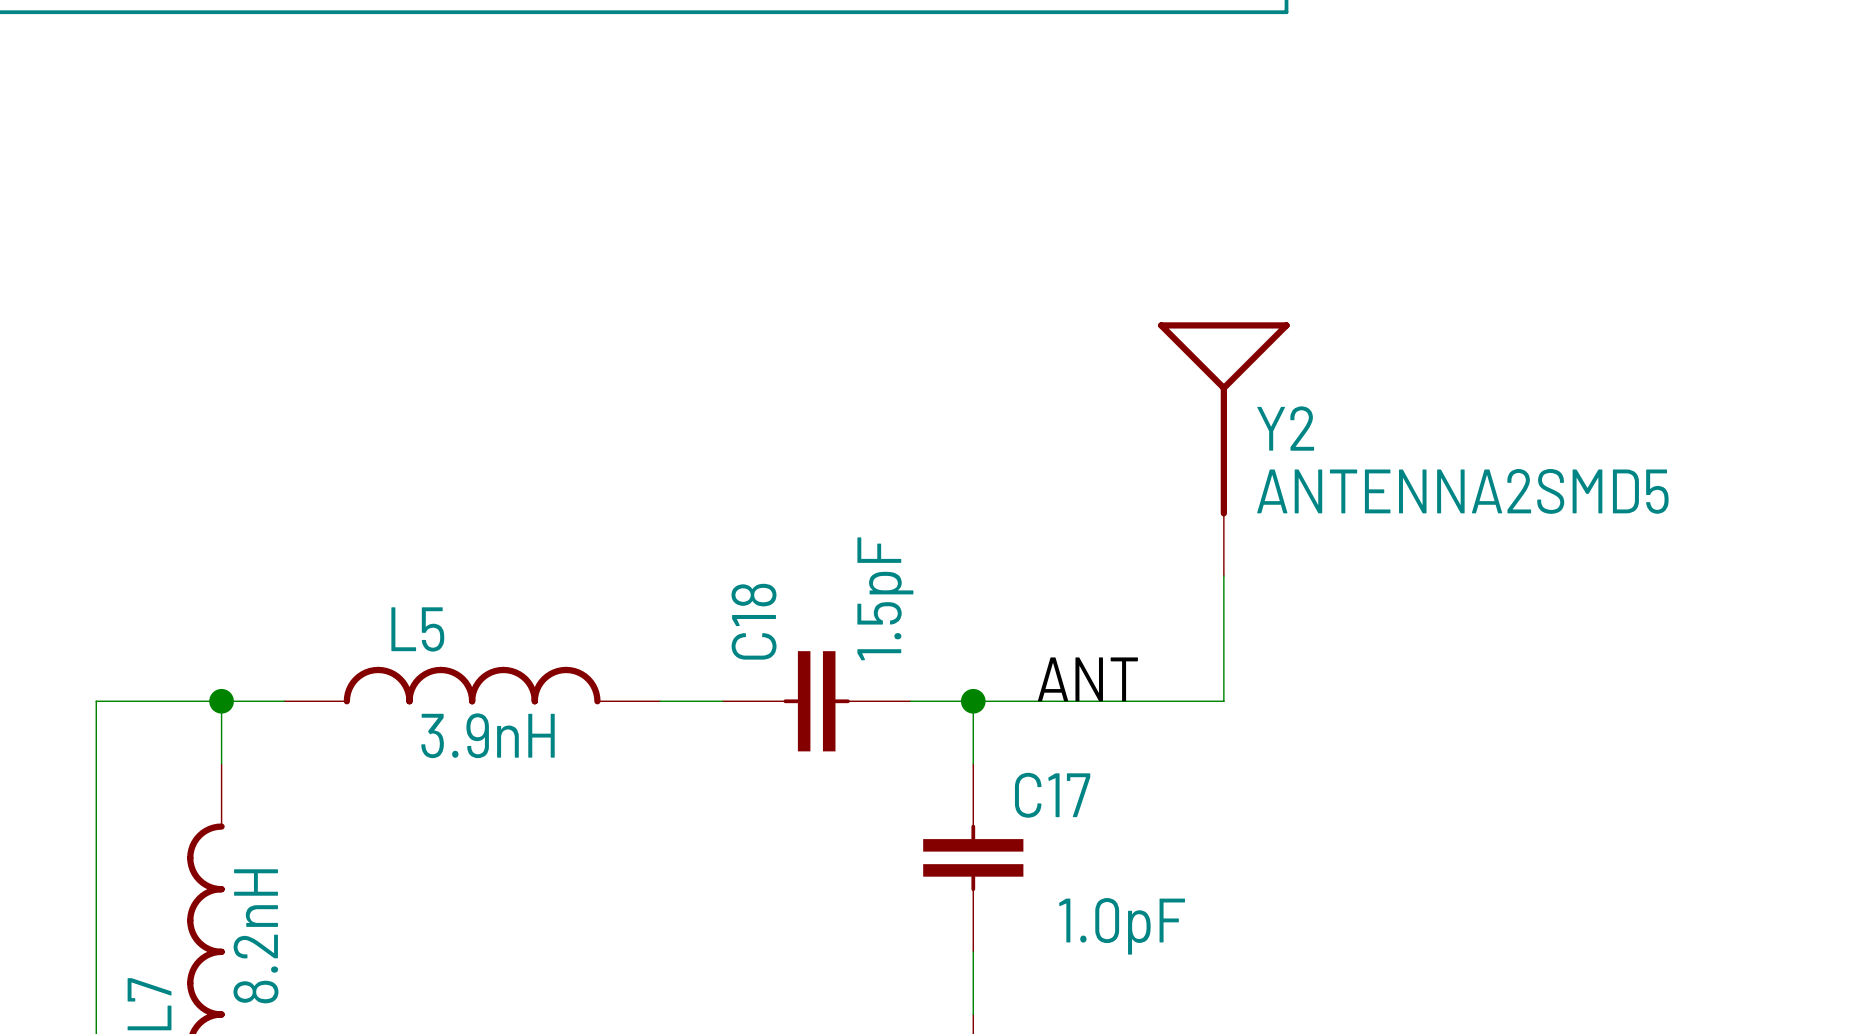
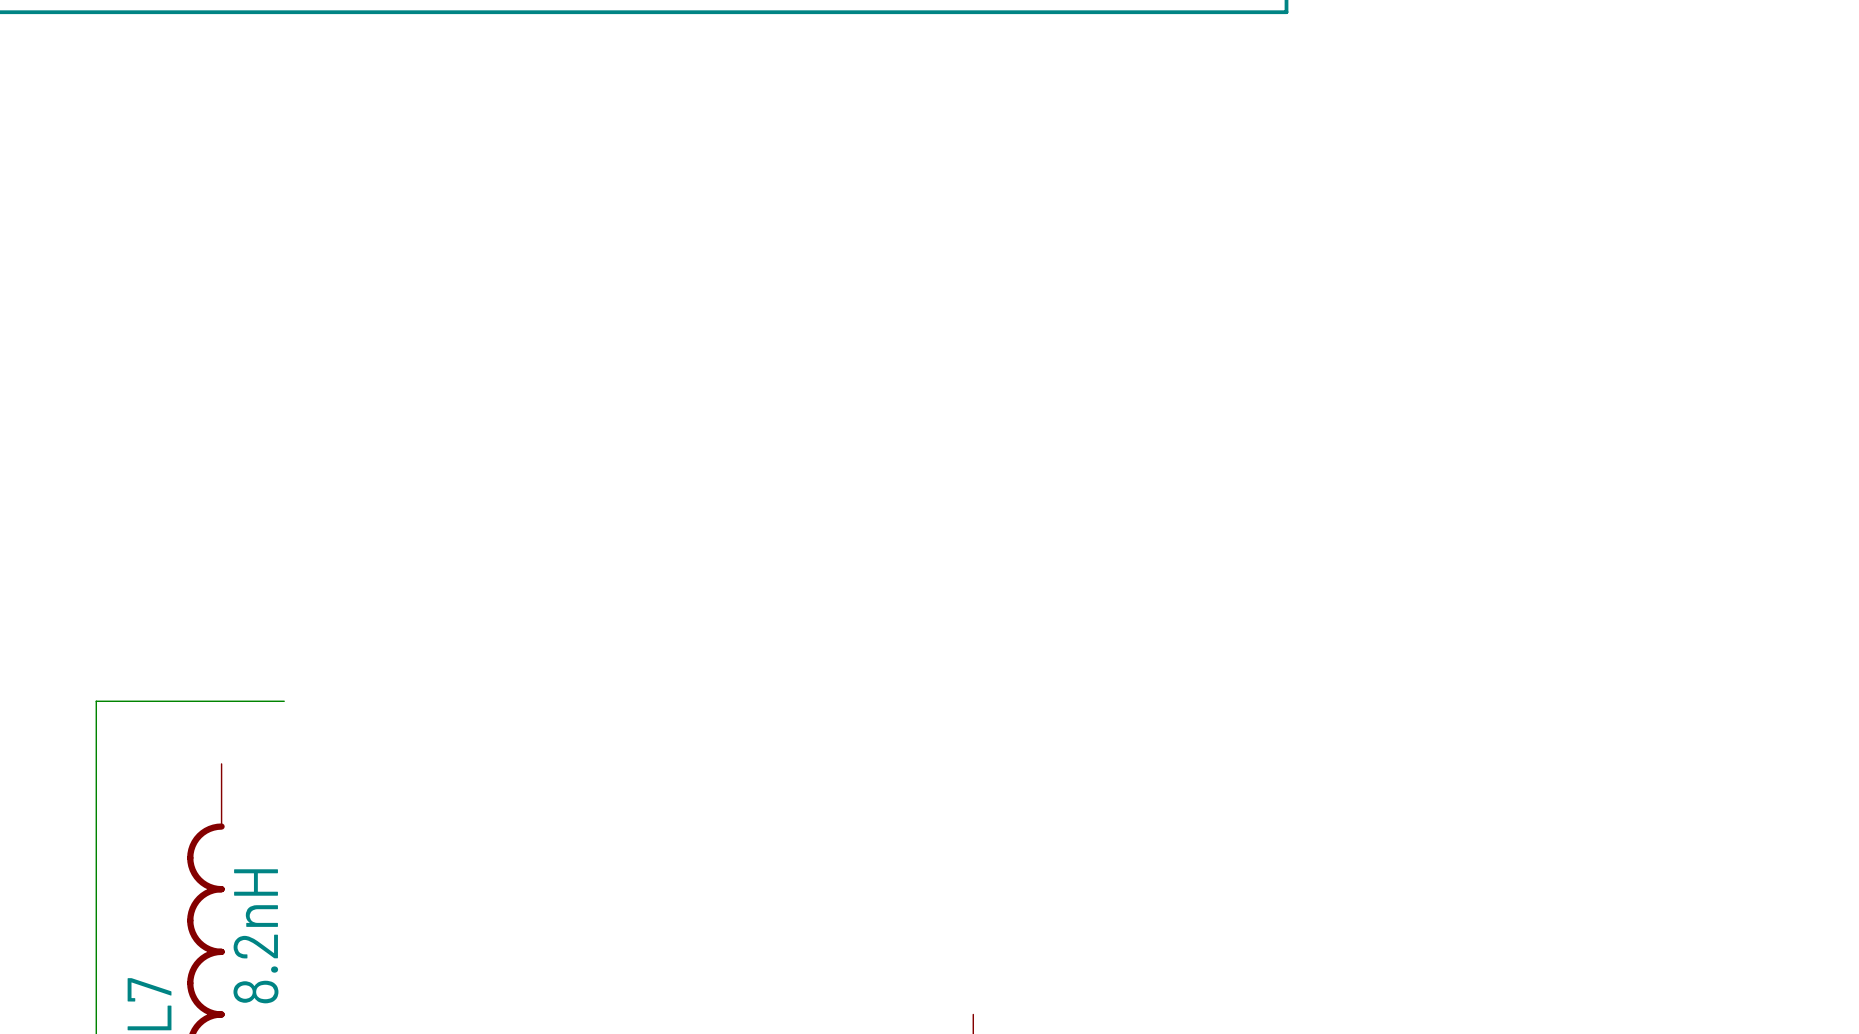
Y2: ANTENNA2SMD5 (1223, 449) -> none
wire: (1223, 575) (1223, 701) (910, 701) -> none
label: ANT (1087, 679) -> none
L5: 3.9nH (472, 685) -> none
wire: (221, 701) (221, 763) -> none
junction: (221, 701) -> none
wire: (660, 701) (722, 701) -> none
C18: 1.5pF (816, 701) -> none
wire: (973, 701) (973, 763) -> none
junction: (973, 701) -> none
C17: 1.0pF (973, 857) -> none
wire: (973, 951) (973, 1014) -> none

